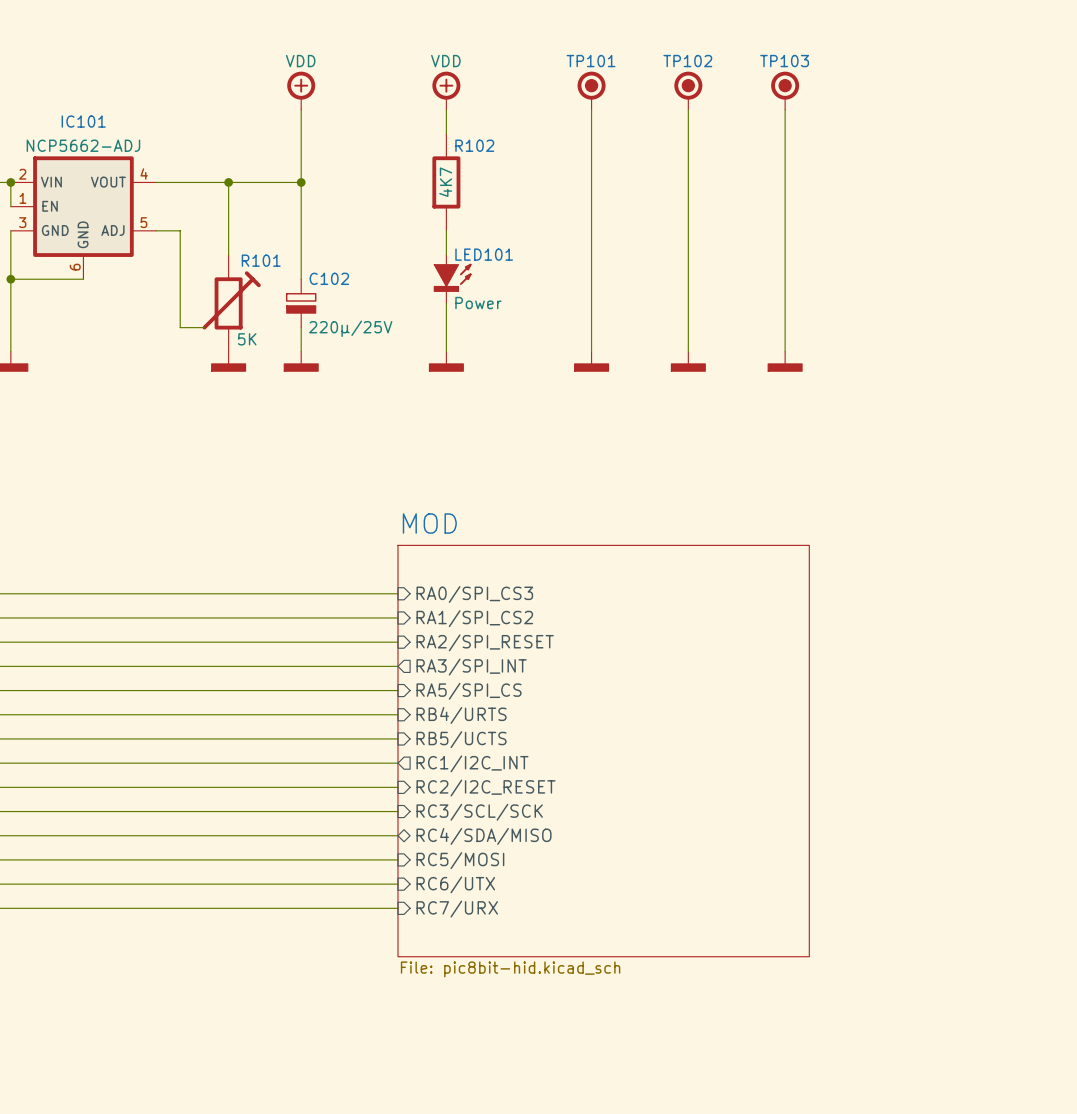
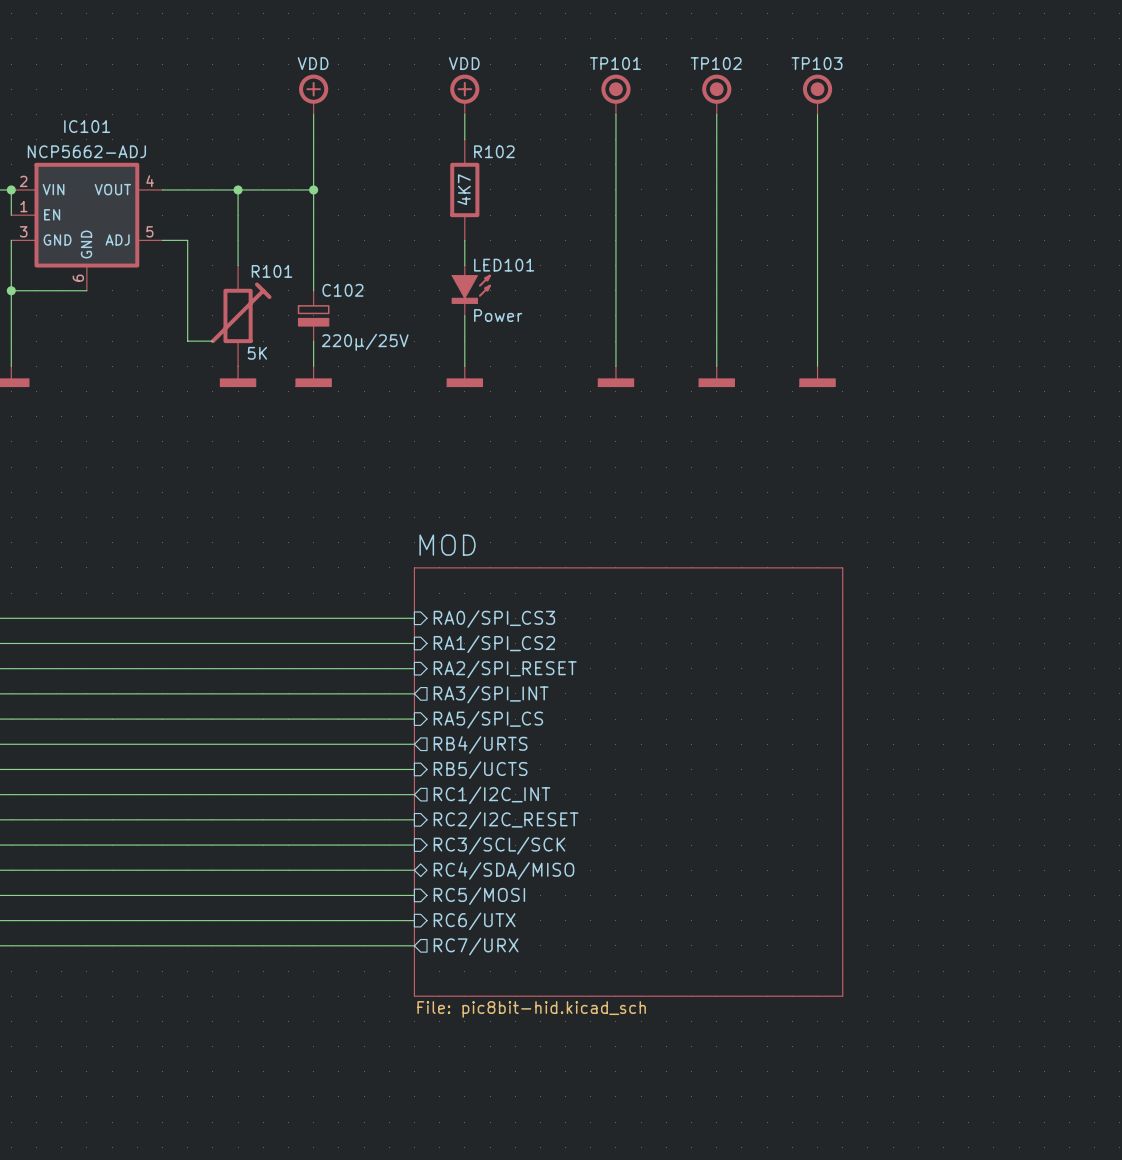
sheet pin shape: input (461, 715) -> output (480, 744)
sheet pin shape: input (457, 909) -> output (476, 946)

